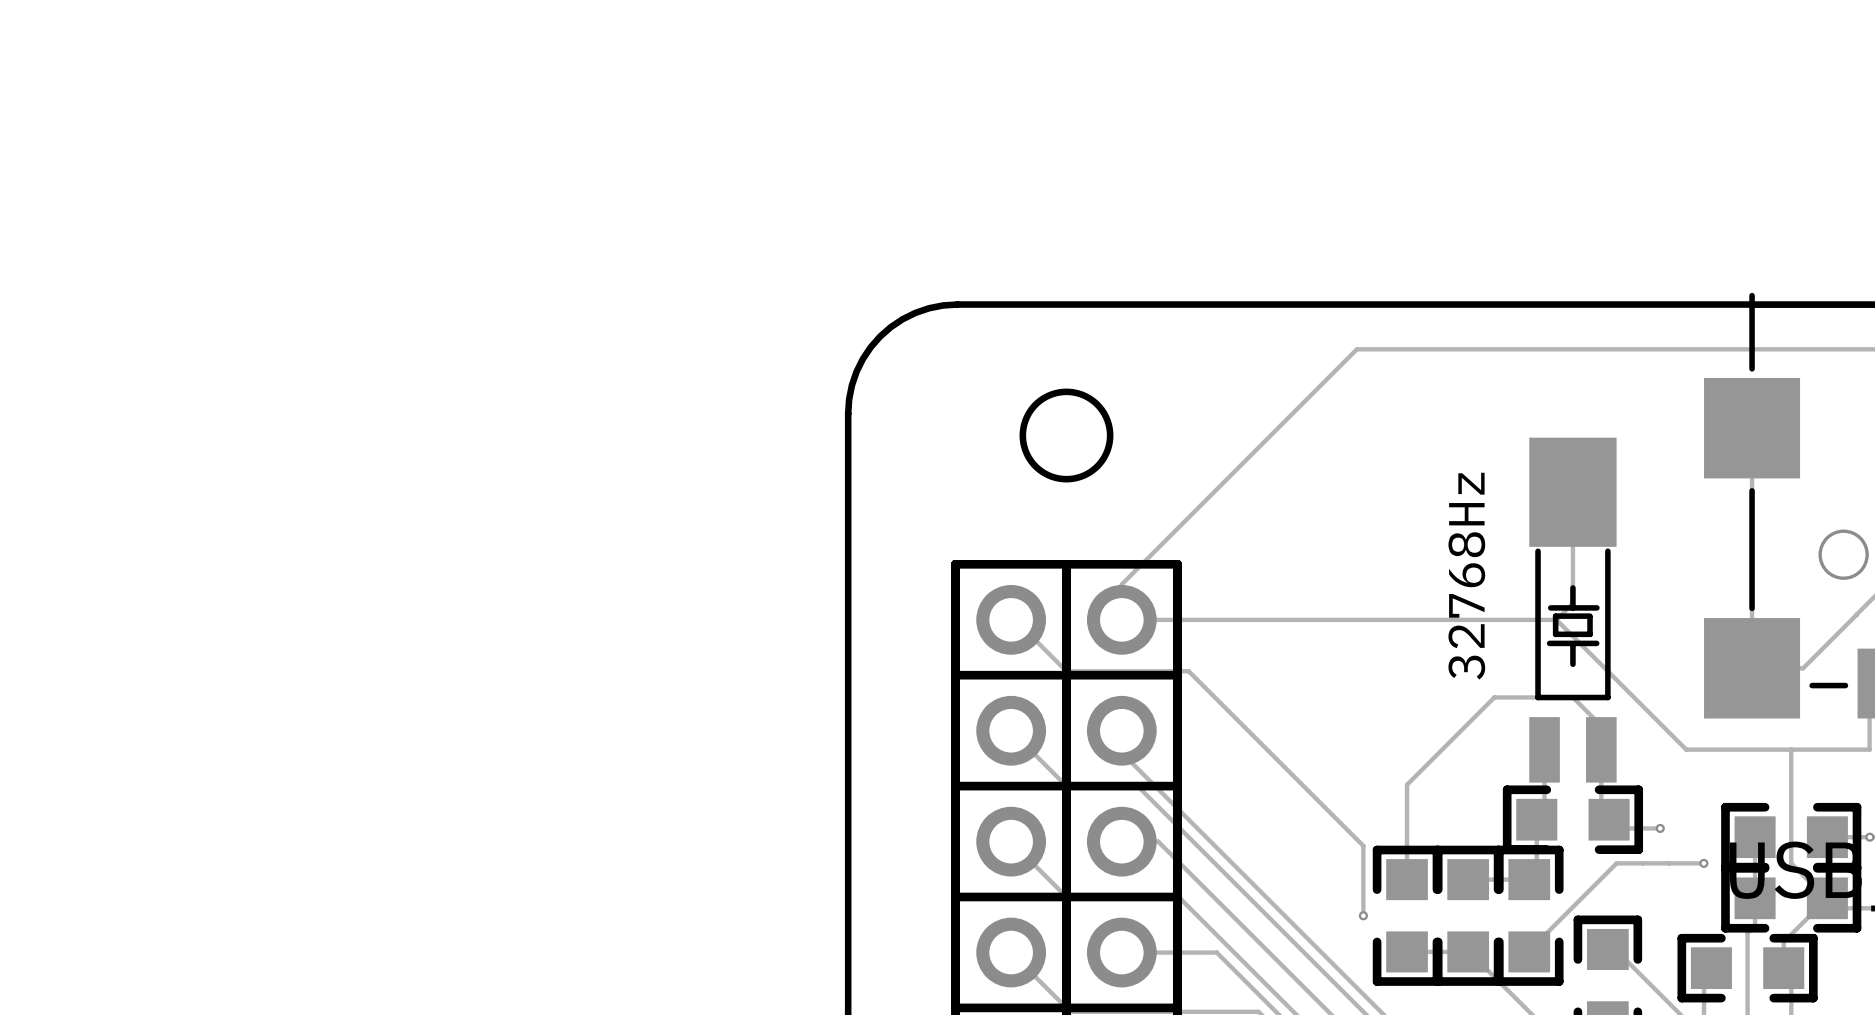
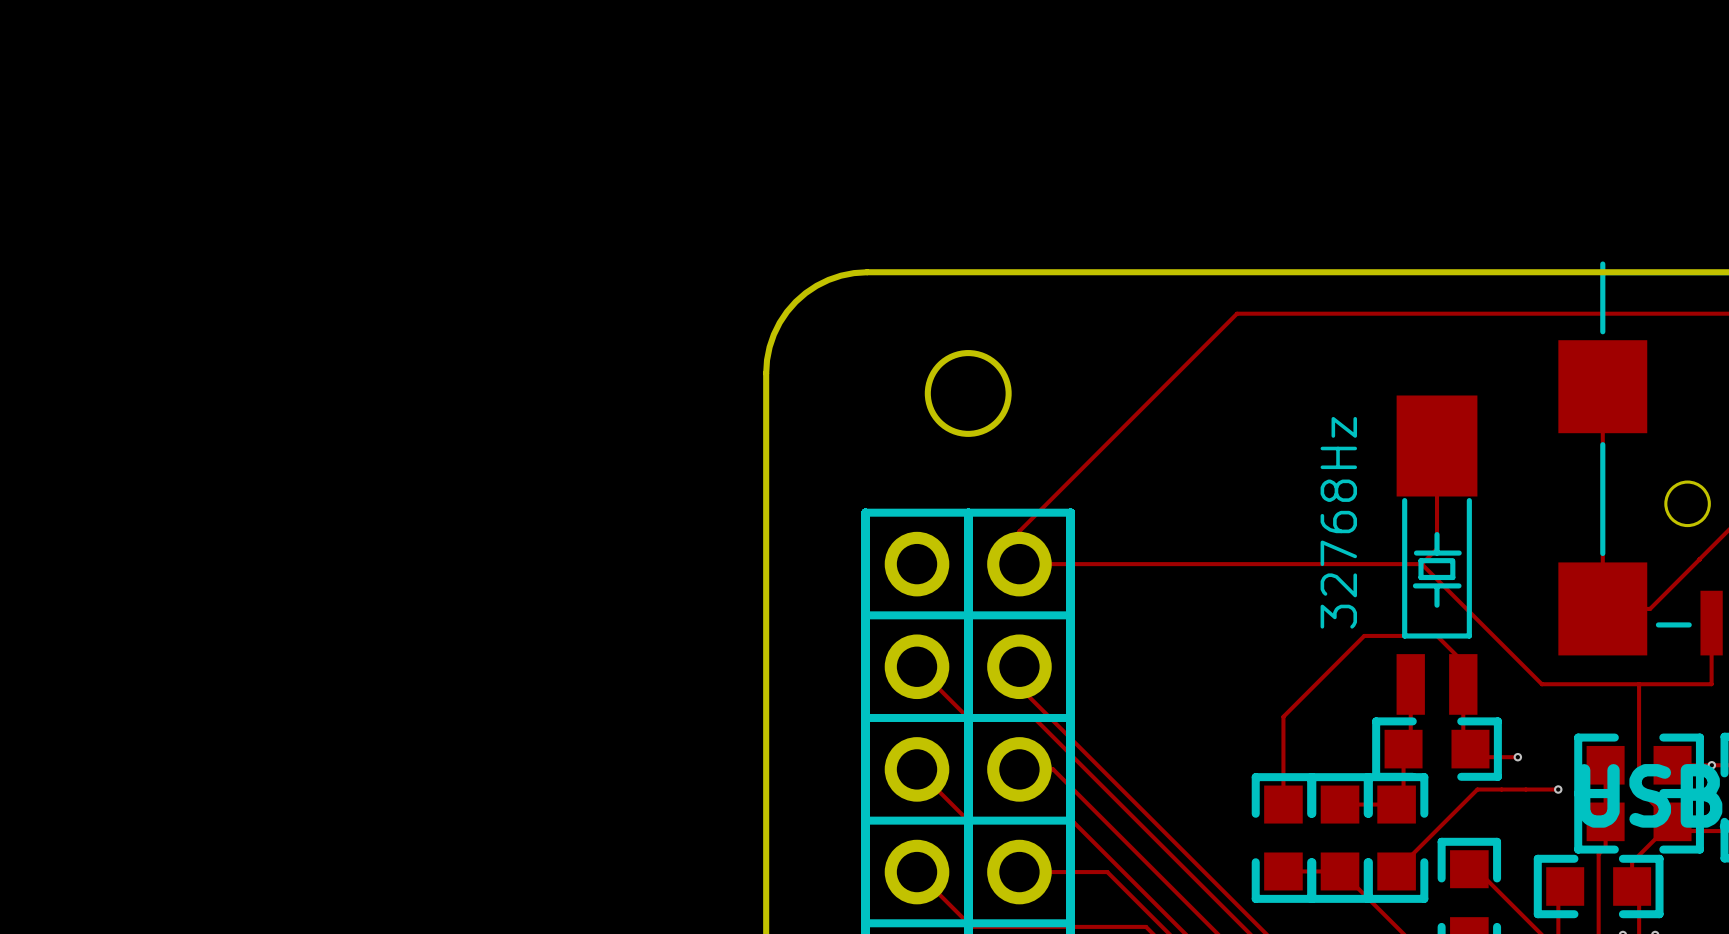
track: (1011, 619) (1015, 619) (1066, 671) (1188, 671) (1363, 845) (1363, 915) -> none
via: (1363, 915) -> none

